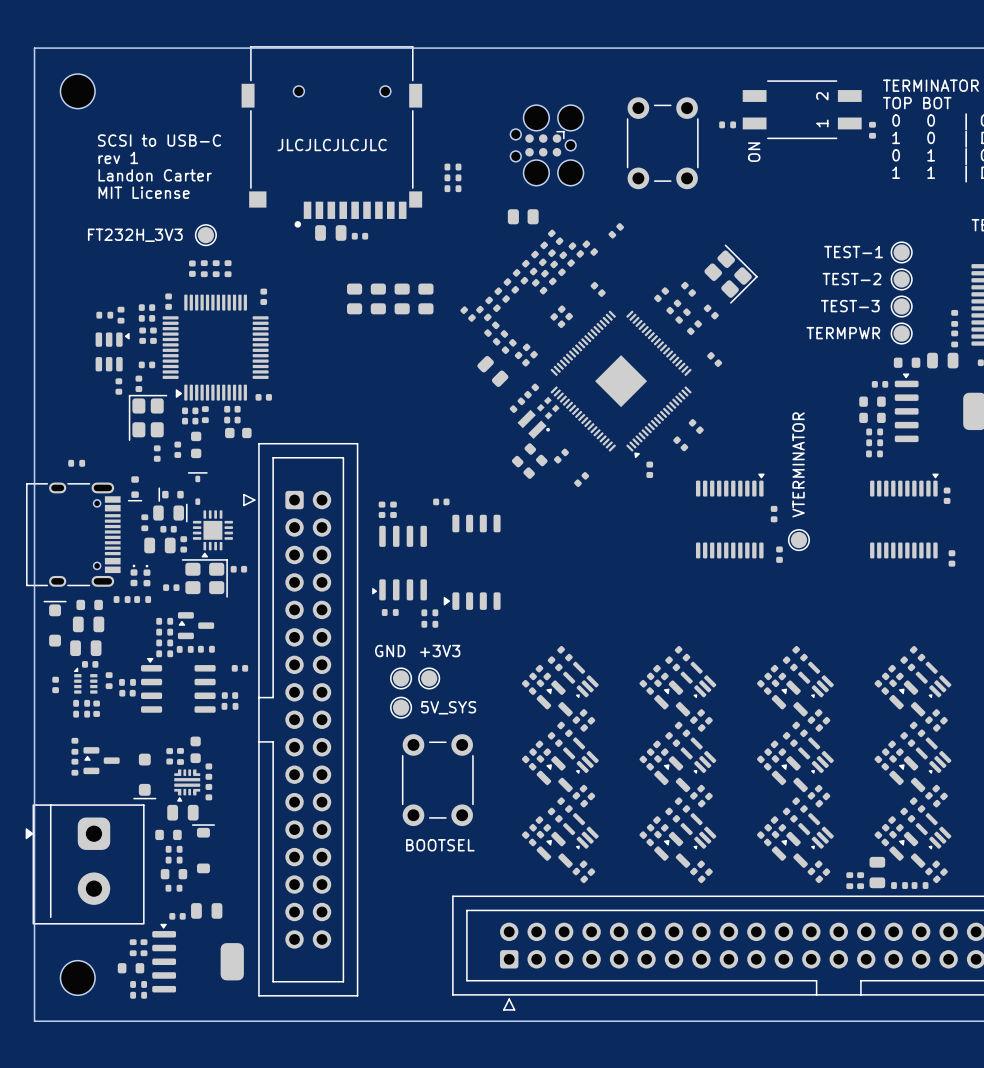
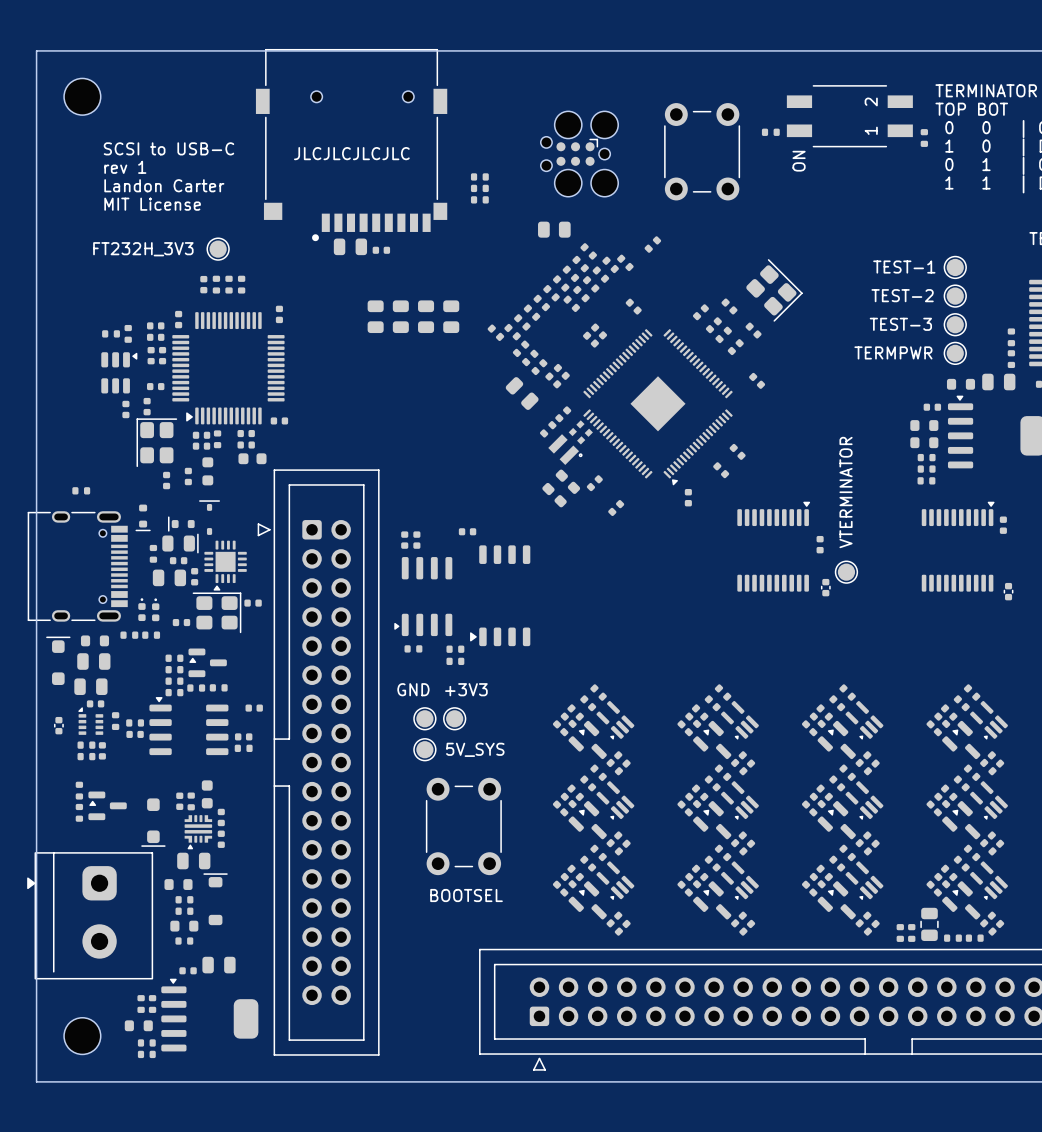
part footprint: [776, 546, 783, 563] -> [821, 578, 831, 597]
part footprint: [948, 550, 956, 567] -> [1003, 582, 1014, 601]
part footprint: [52, 676, 59, 694] -> [54, 716, 64, 735]
part footprint: [869, 856, 886, 889] -> [920, 907, 939, 942]

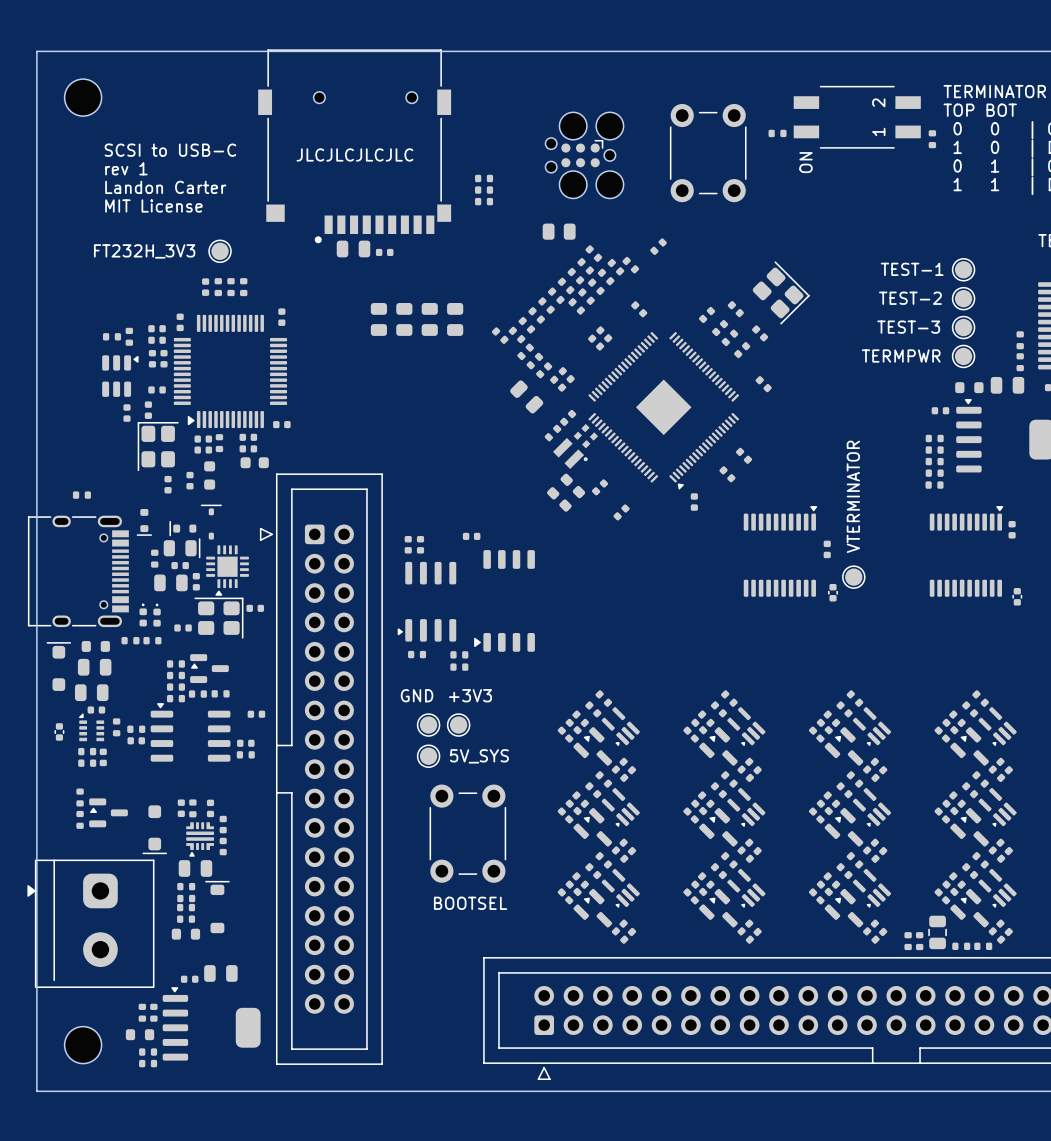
part: (924, 425) -> none
part: none -> (934, 438)
part: (924, 442) -> none
part: none -> (934, 450)
part footprint: [201, 780, 213, 809] -> [206, 799, 215, 818]
part: none -> (186, 886)
part: (178, 884) -> none
part: none -> (186, 898)
part: (184, 941) -> none

